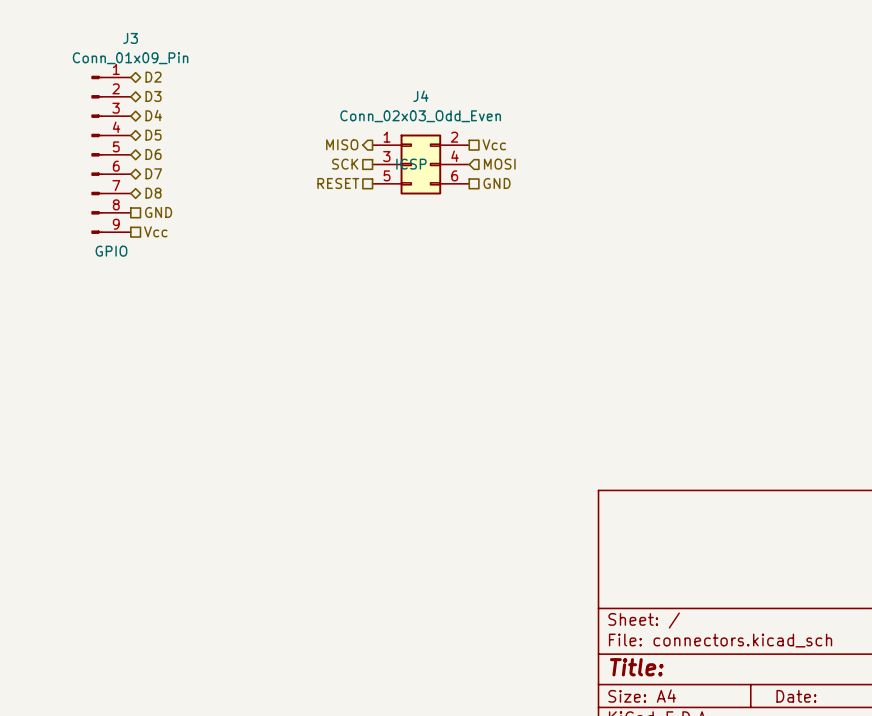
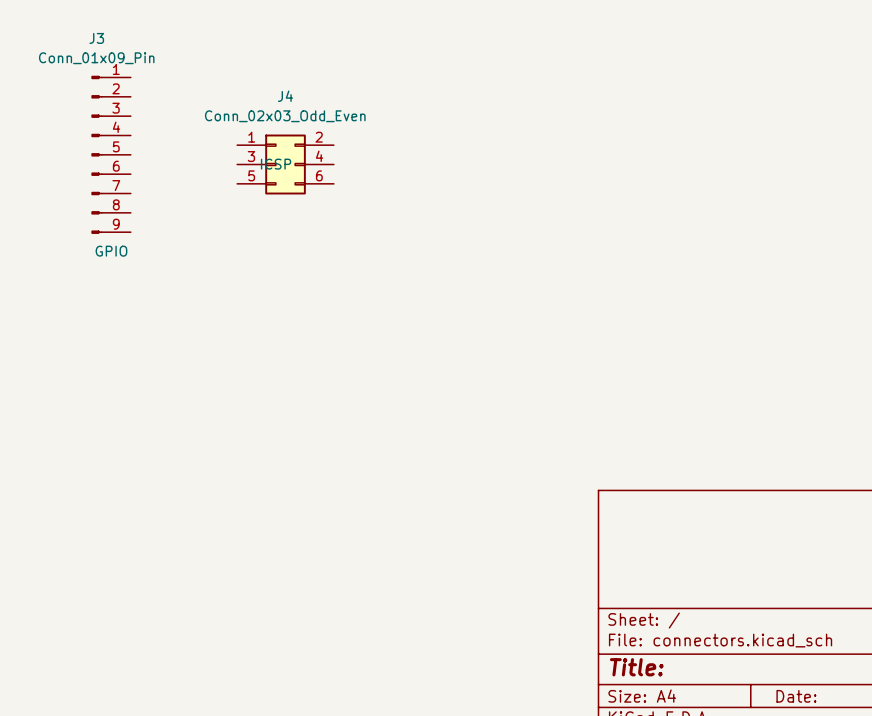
J3 name position: J3 (130, 38) -> J3 (96, 38)
J3 value position: Conn_01x09_Pin (130, 58) -> Conn_01x09_Pin (96, 58)
hierarchical label: D2 (153, 77) -> none
hierarchical label: D3 (153, 96) -> none
hierarchical label: D4 (153, 115) -> none
hierarchical label: D5 (153, 135) -> none
hierarchical label: MISO (342, 144) -> none
hierarchical label: Vcc (494, 144) -> none
hierarchical label: D6 (153, 154) -> none
hierarchical label: SCK (345, 164) -> none
J4 position: (420, 164) -> (285, 164)
hierarchical label: MOSI (499, 164) -> none
hierarchical label: D7 (153, 173) -> none
hierarchical label: RESET (338, 183) -> none
hierarchical label: GND (497, 183) -> none
hierarchical label: D8 (153, 193) -> none
hierarchical label: GND (158, 212) -> none
hierarchical label: Vcc (155, 231) -> none

